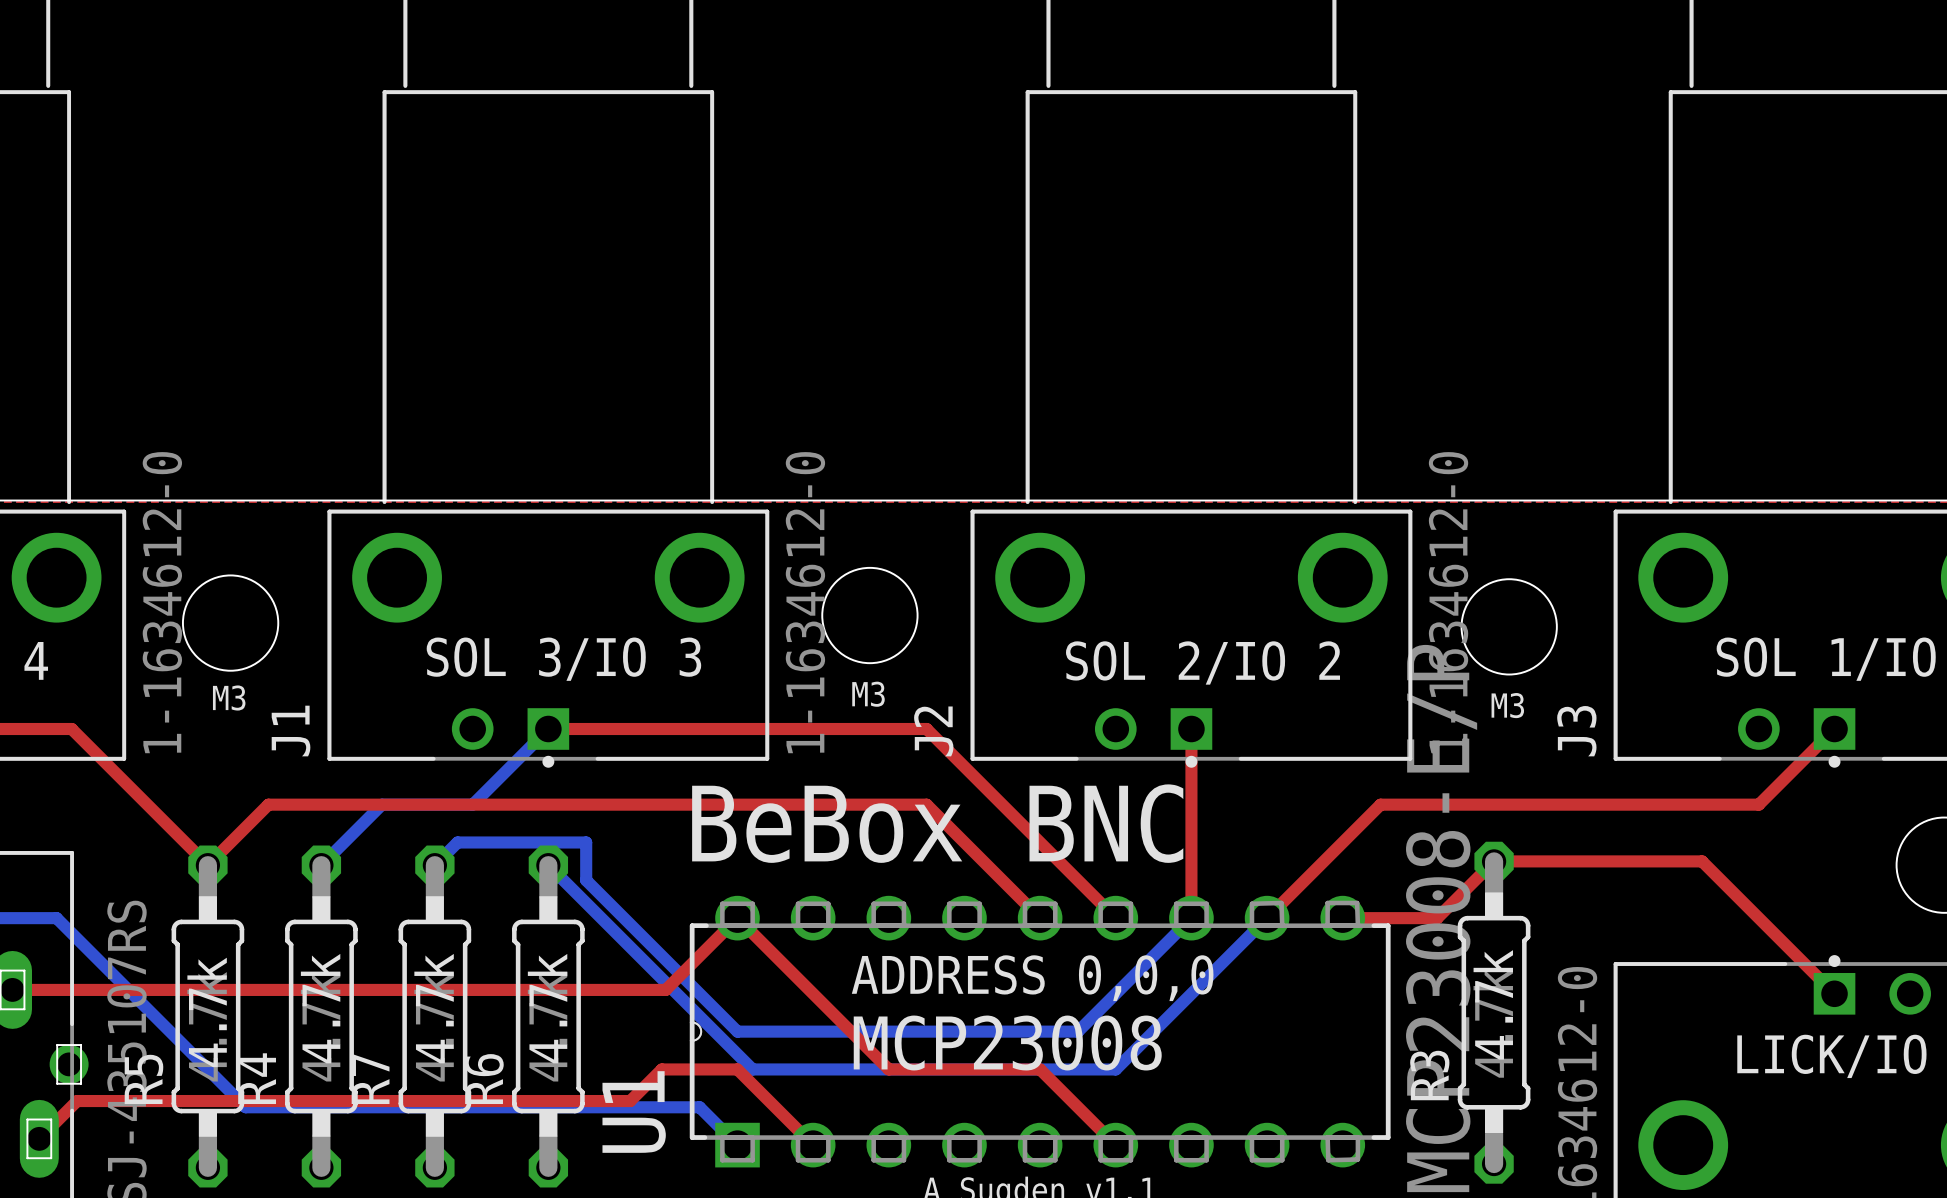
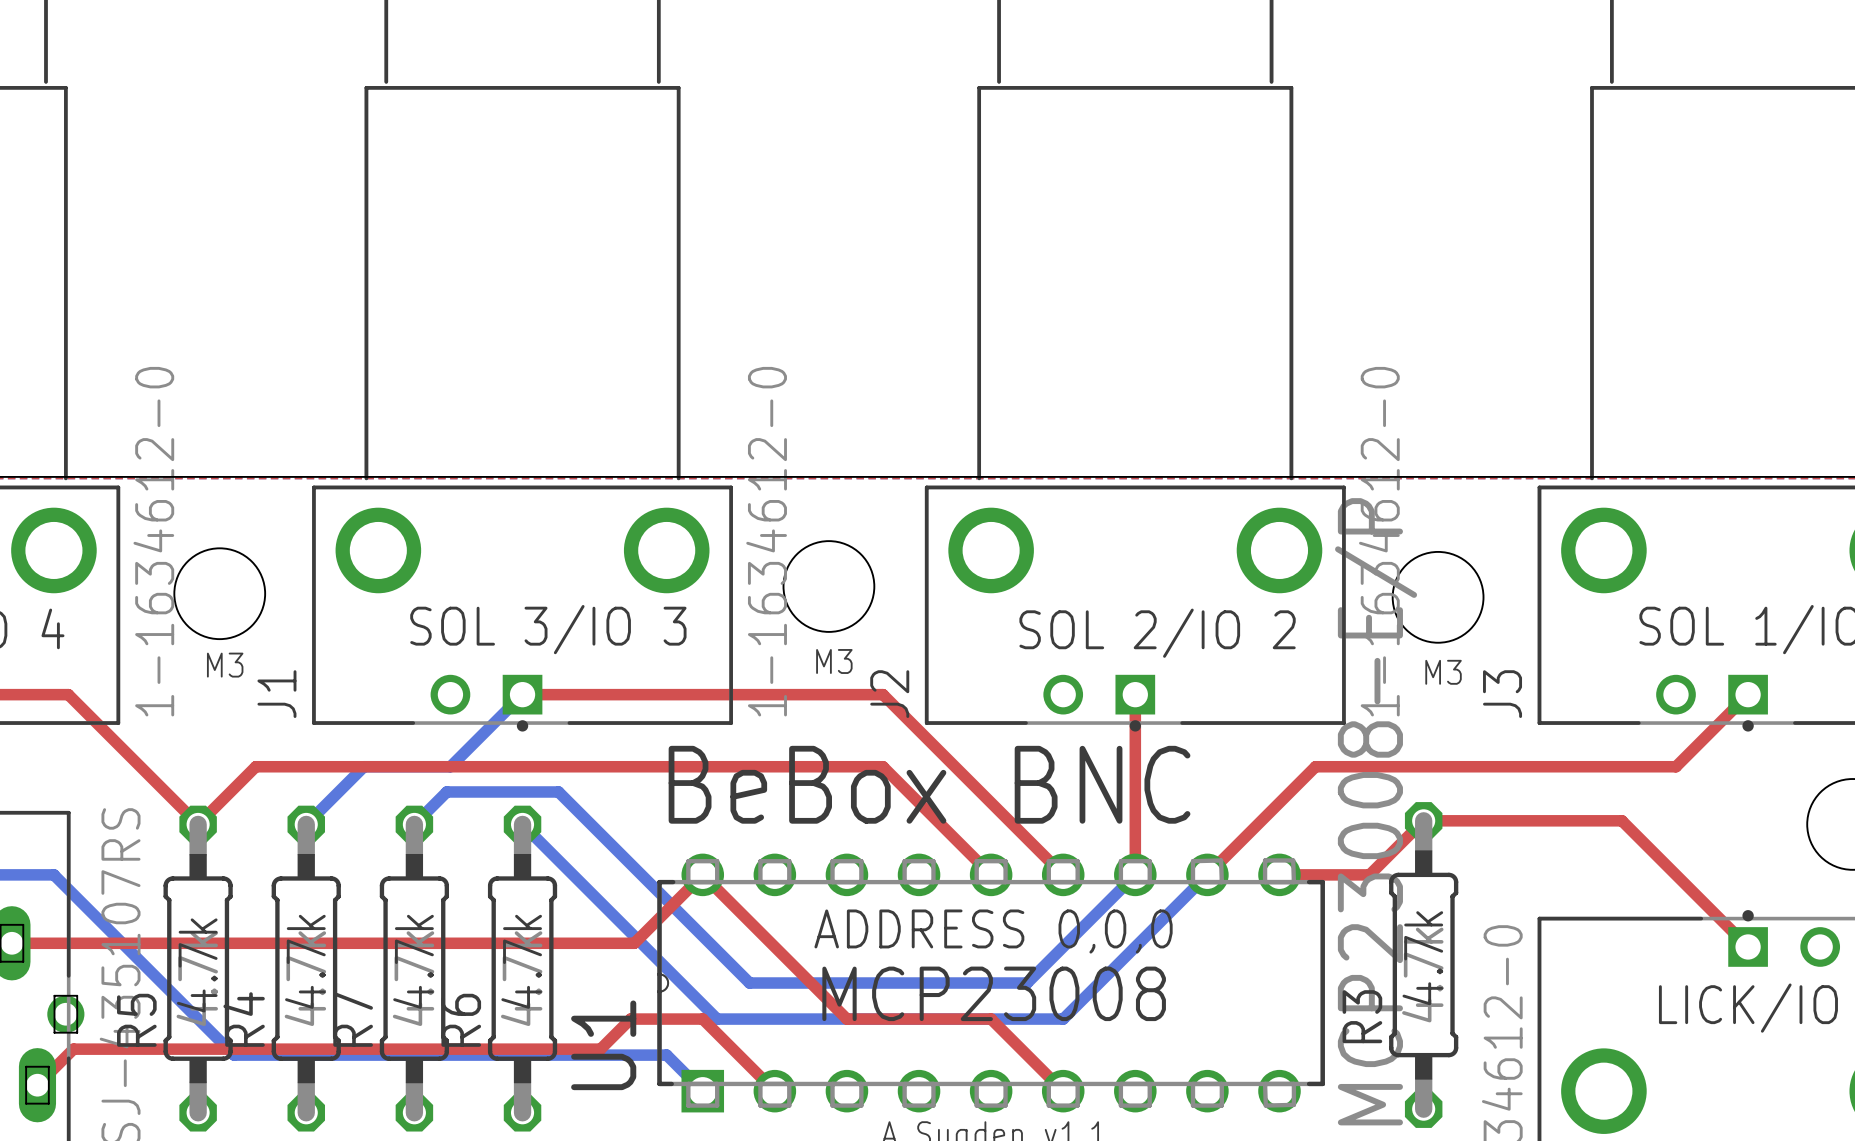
bottom track: (457, 842) (586, 842) (586, 880) (737, 1031) (786, 1031) -> (436, 802) (446, 791) (558, 791) (749, 983)

